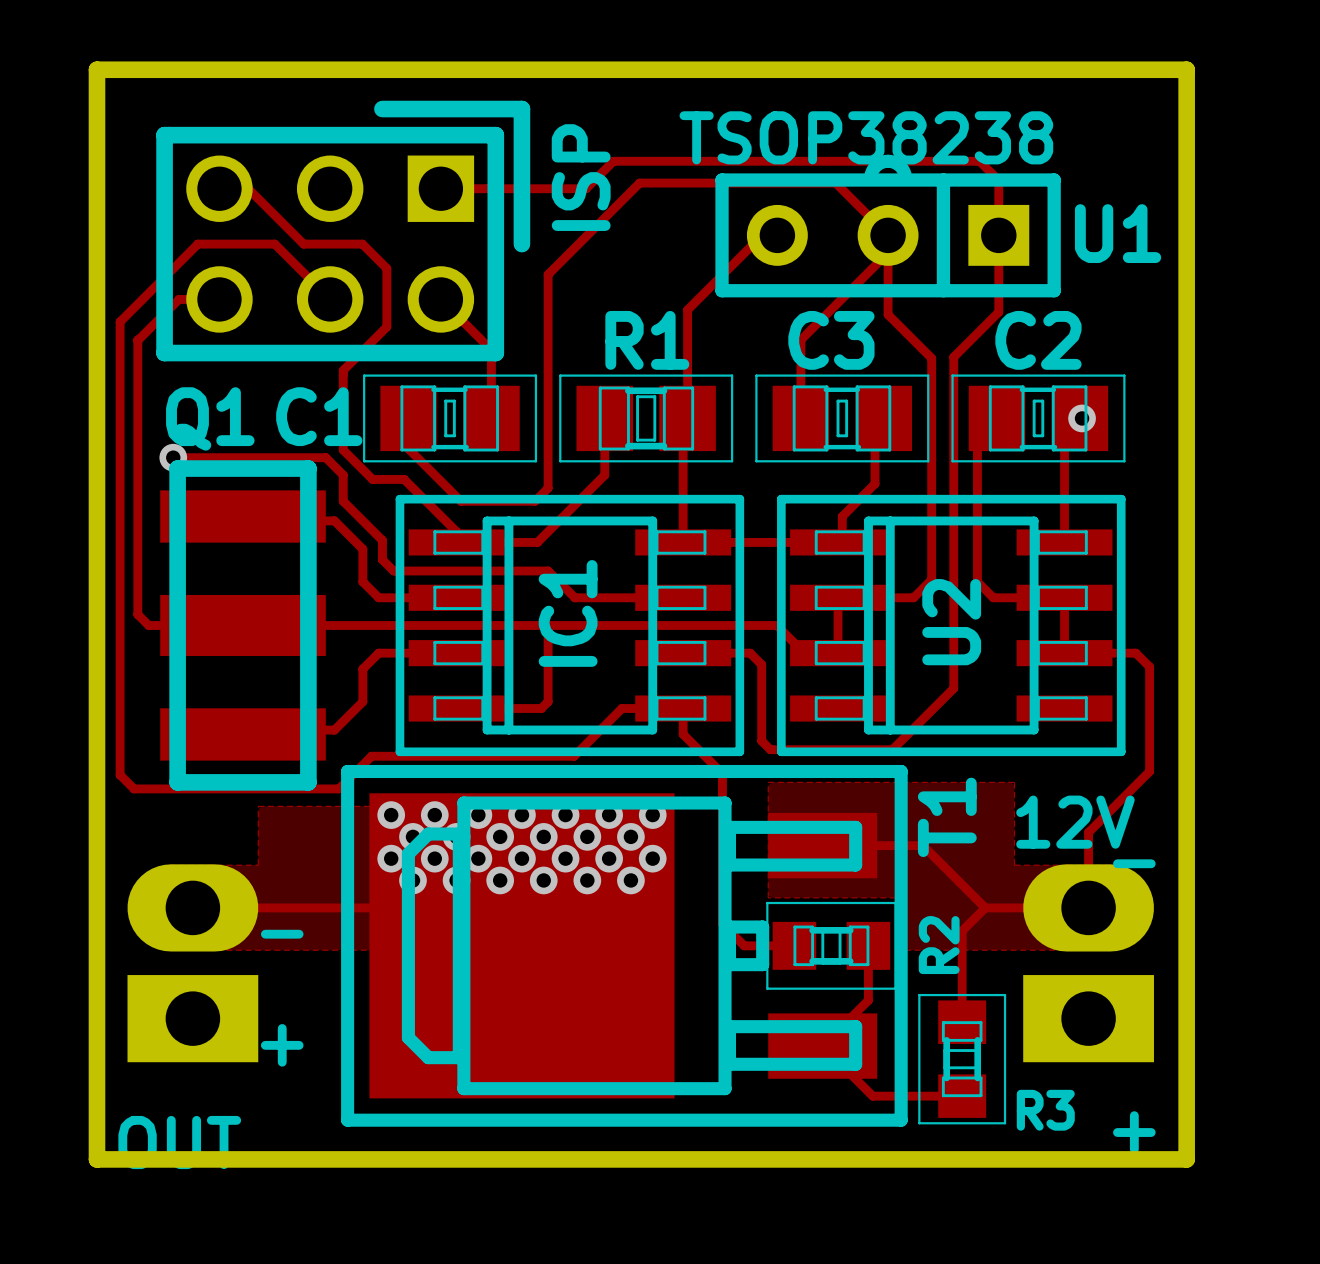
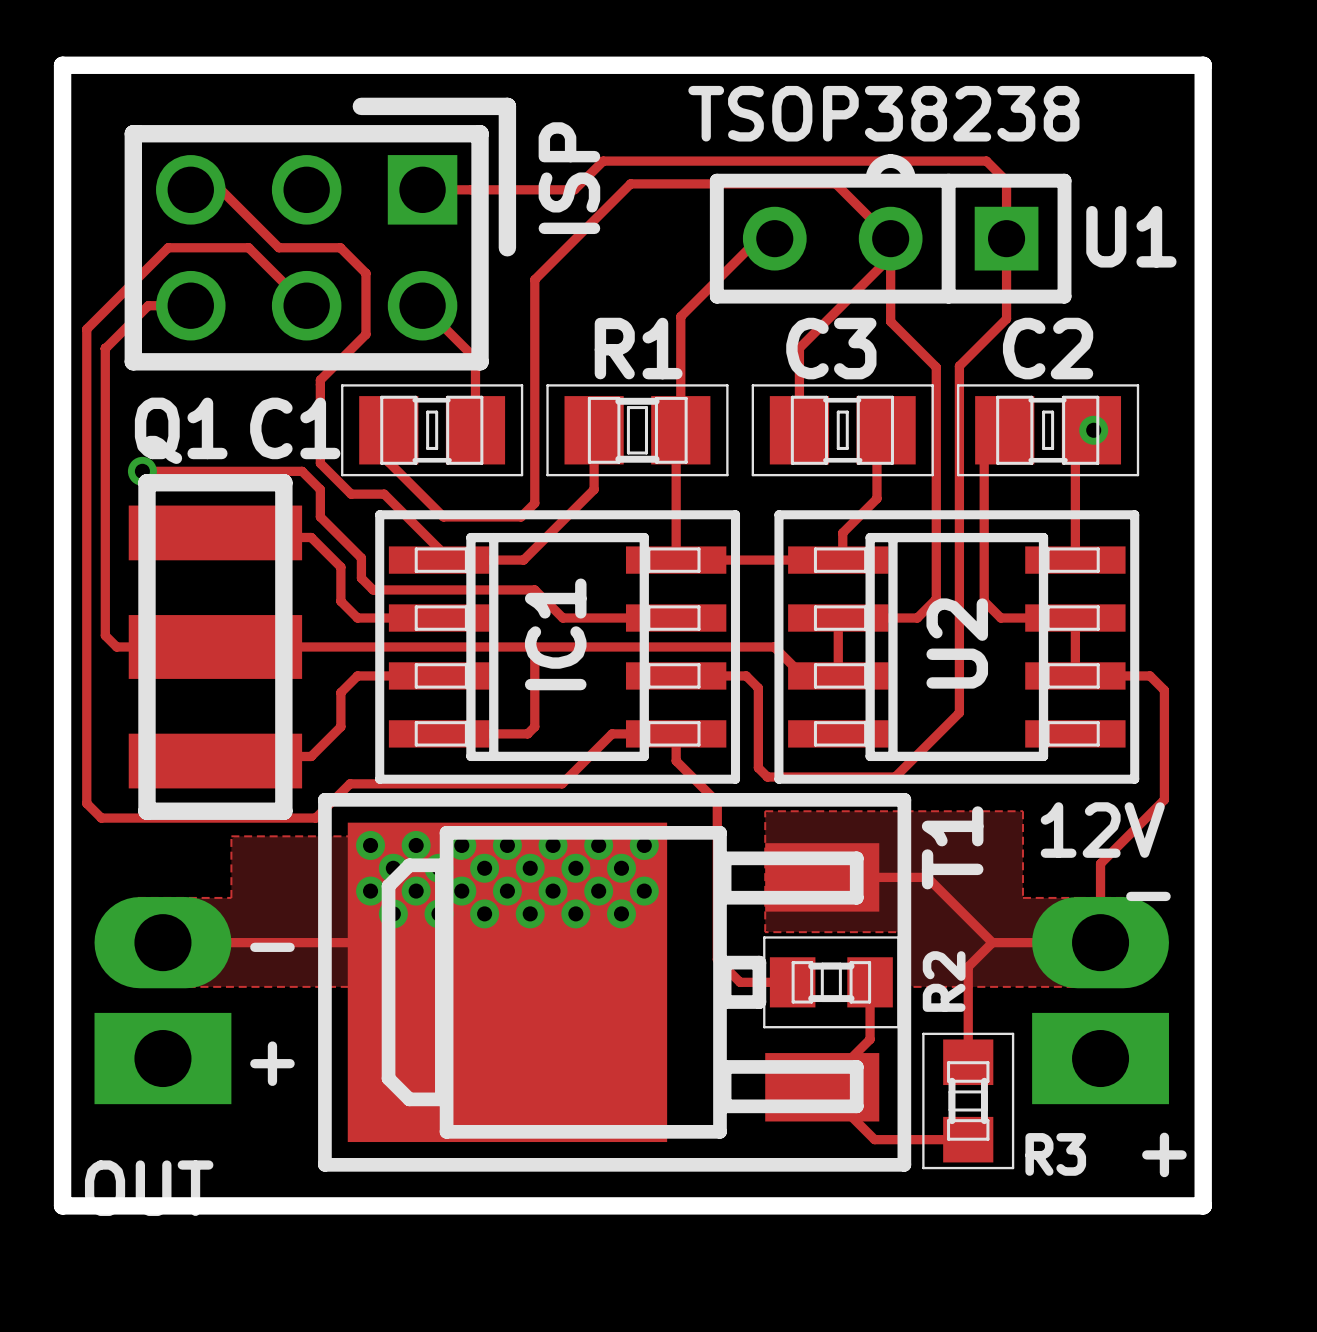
text position: TSOP38238 (866, 137) -> TSOP38238 (883, 113)
text position: 12V (1075, 822) -> 12V (1102, 830)
text position: - (282, 934) -> - (272, 947)
text position: + (282, 1045) -> + (272, 1063)
text position: + (1134, 1132) -> + (1164, 1154)

